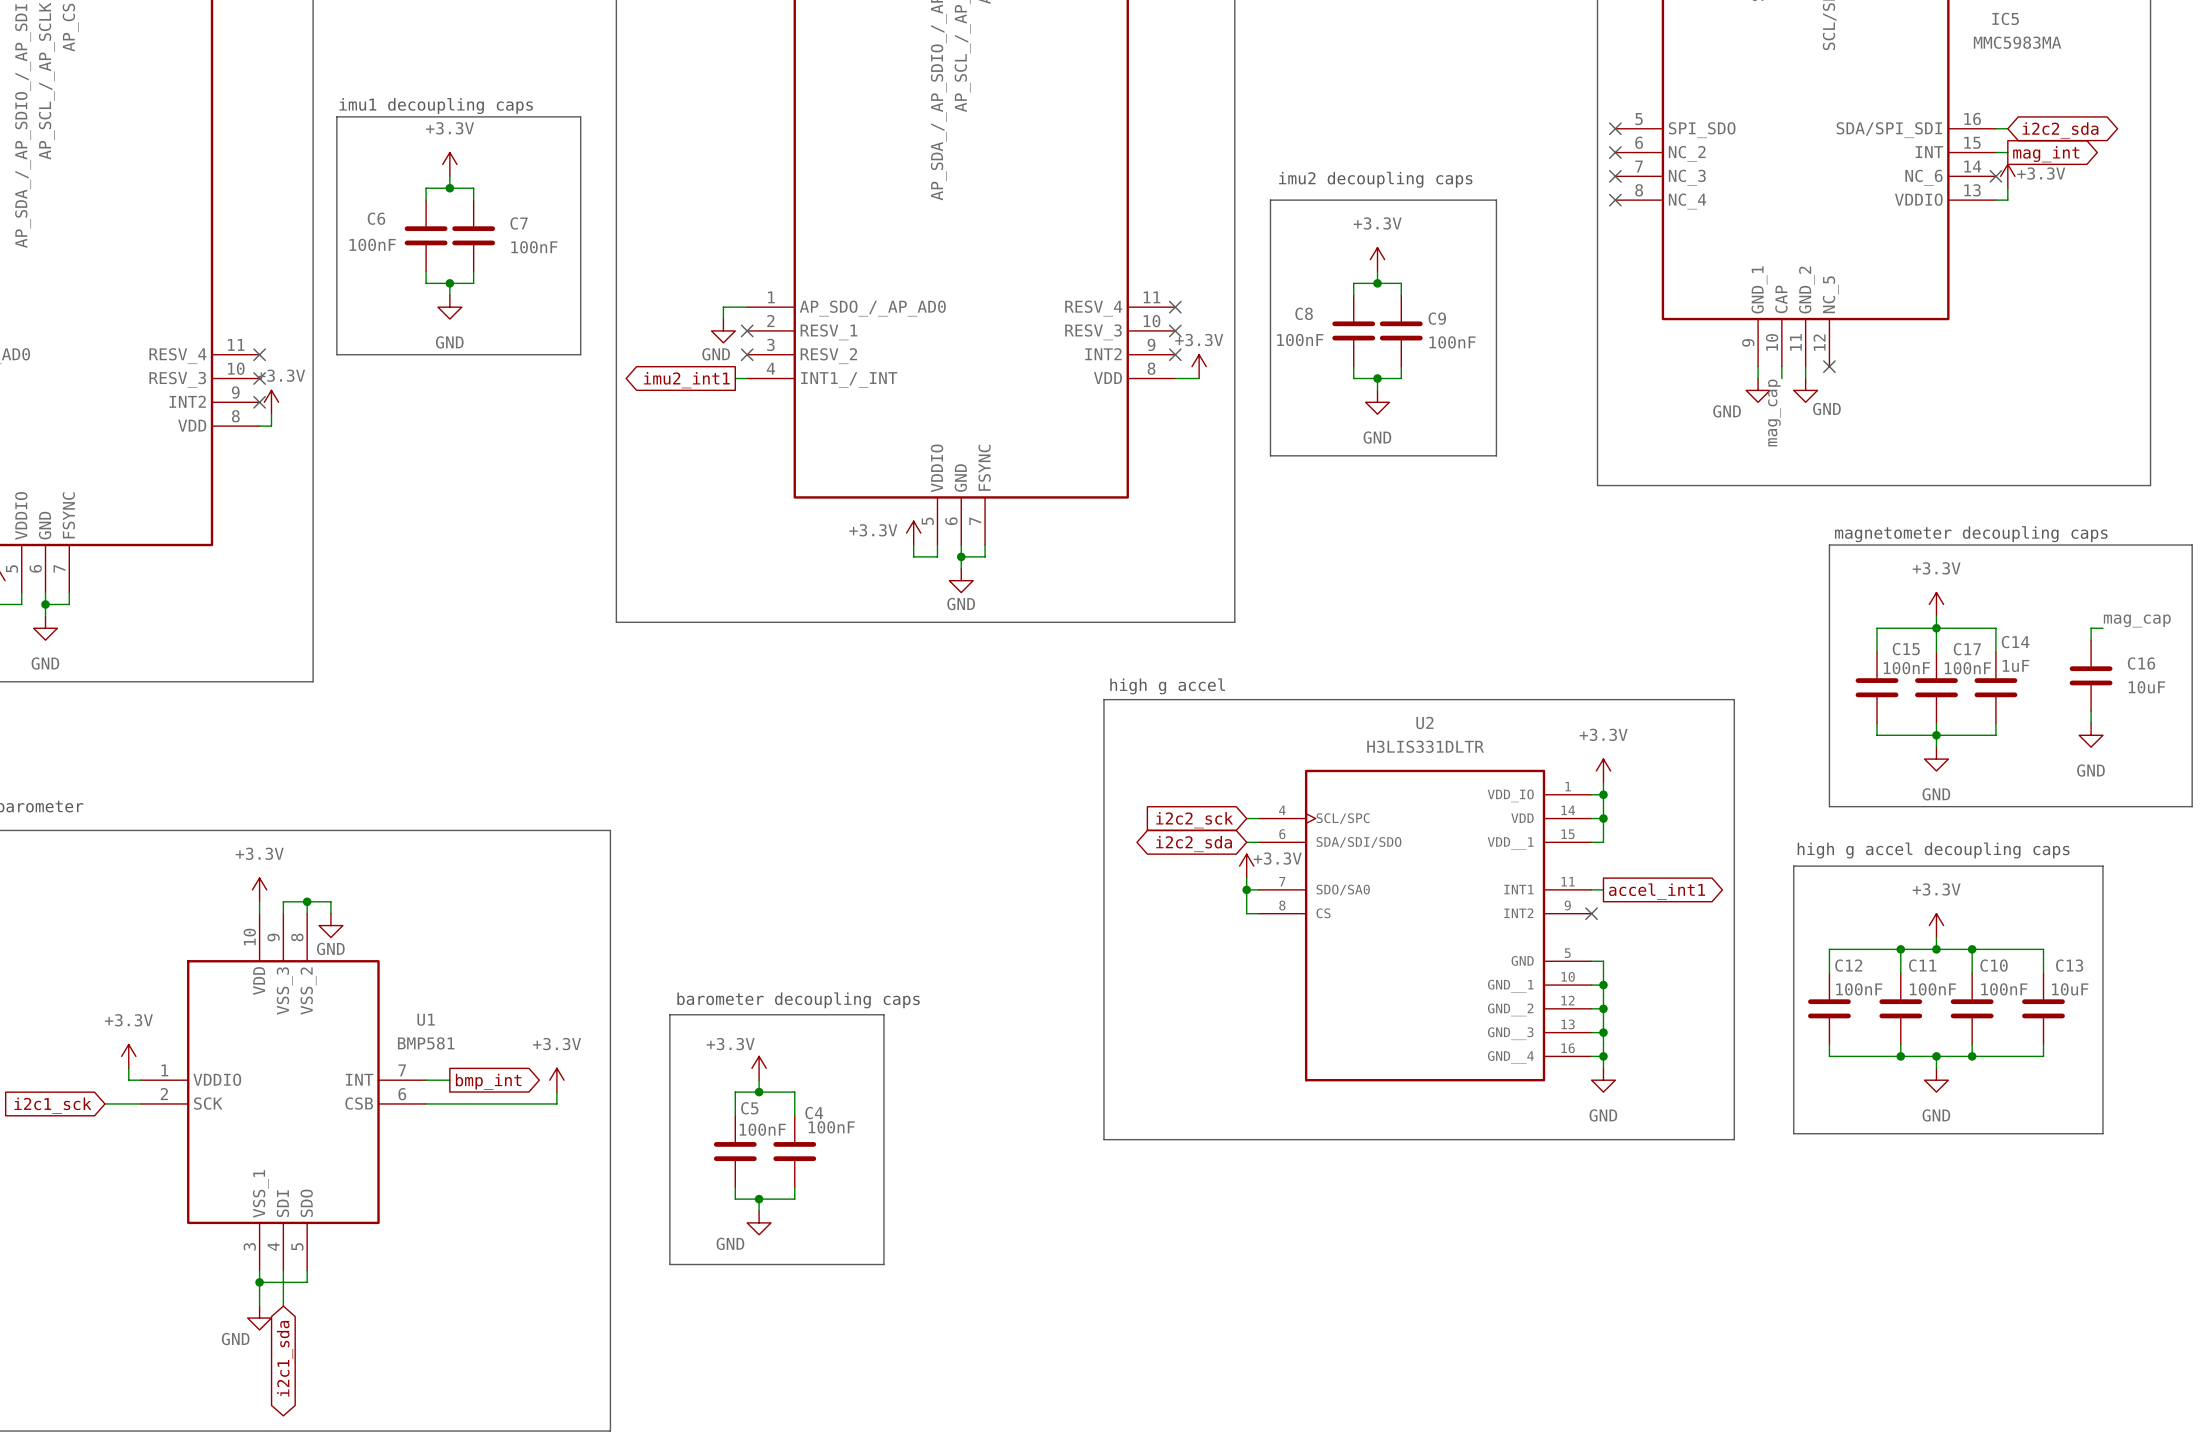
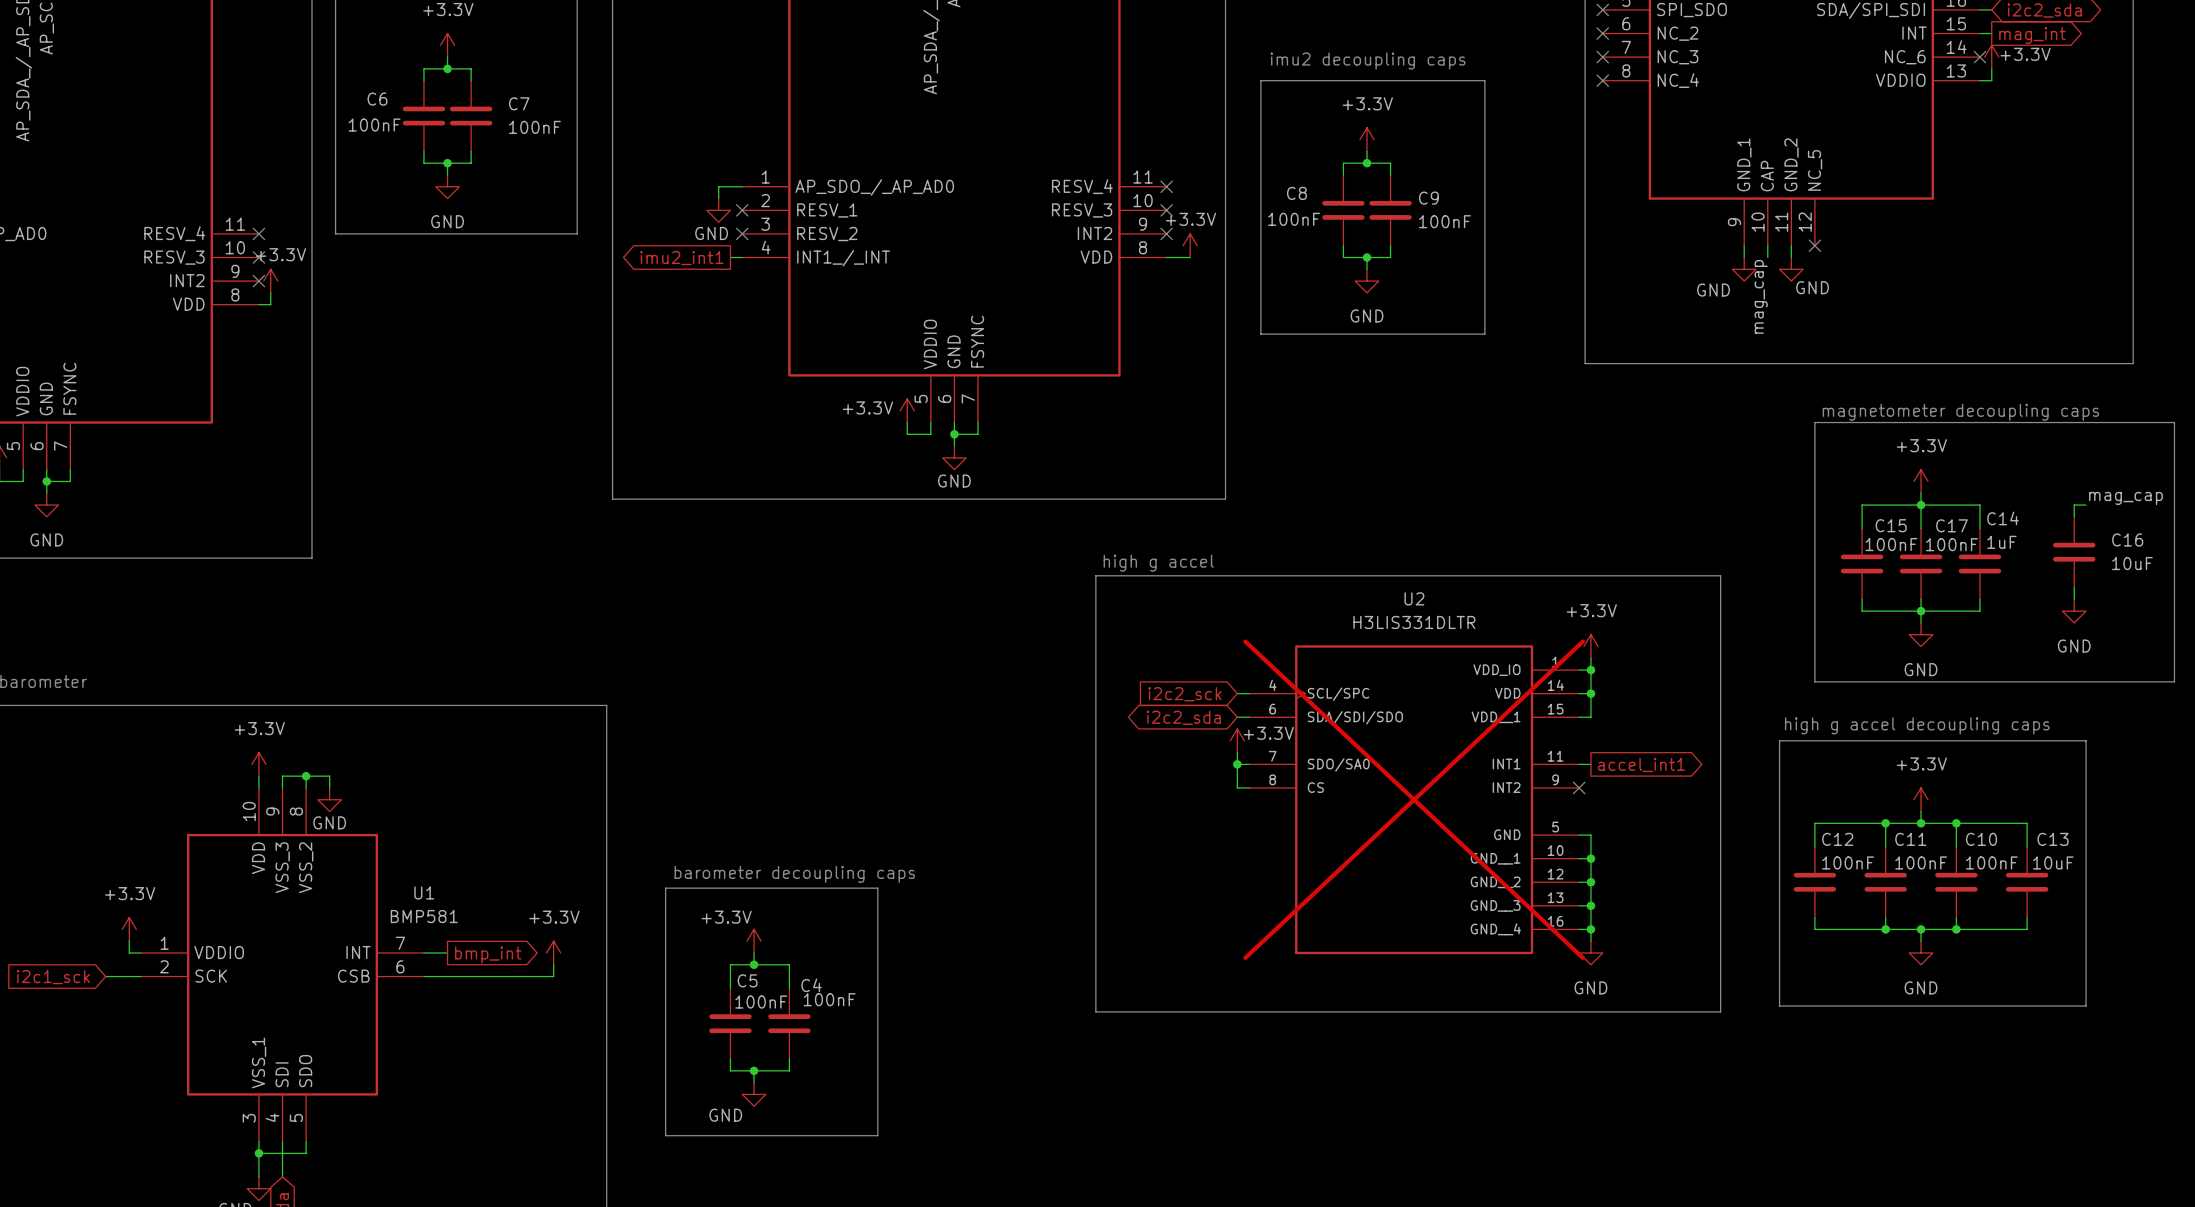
U2 do-not-place cross: none -> (1414, 799)

